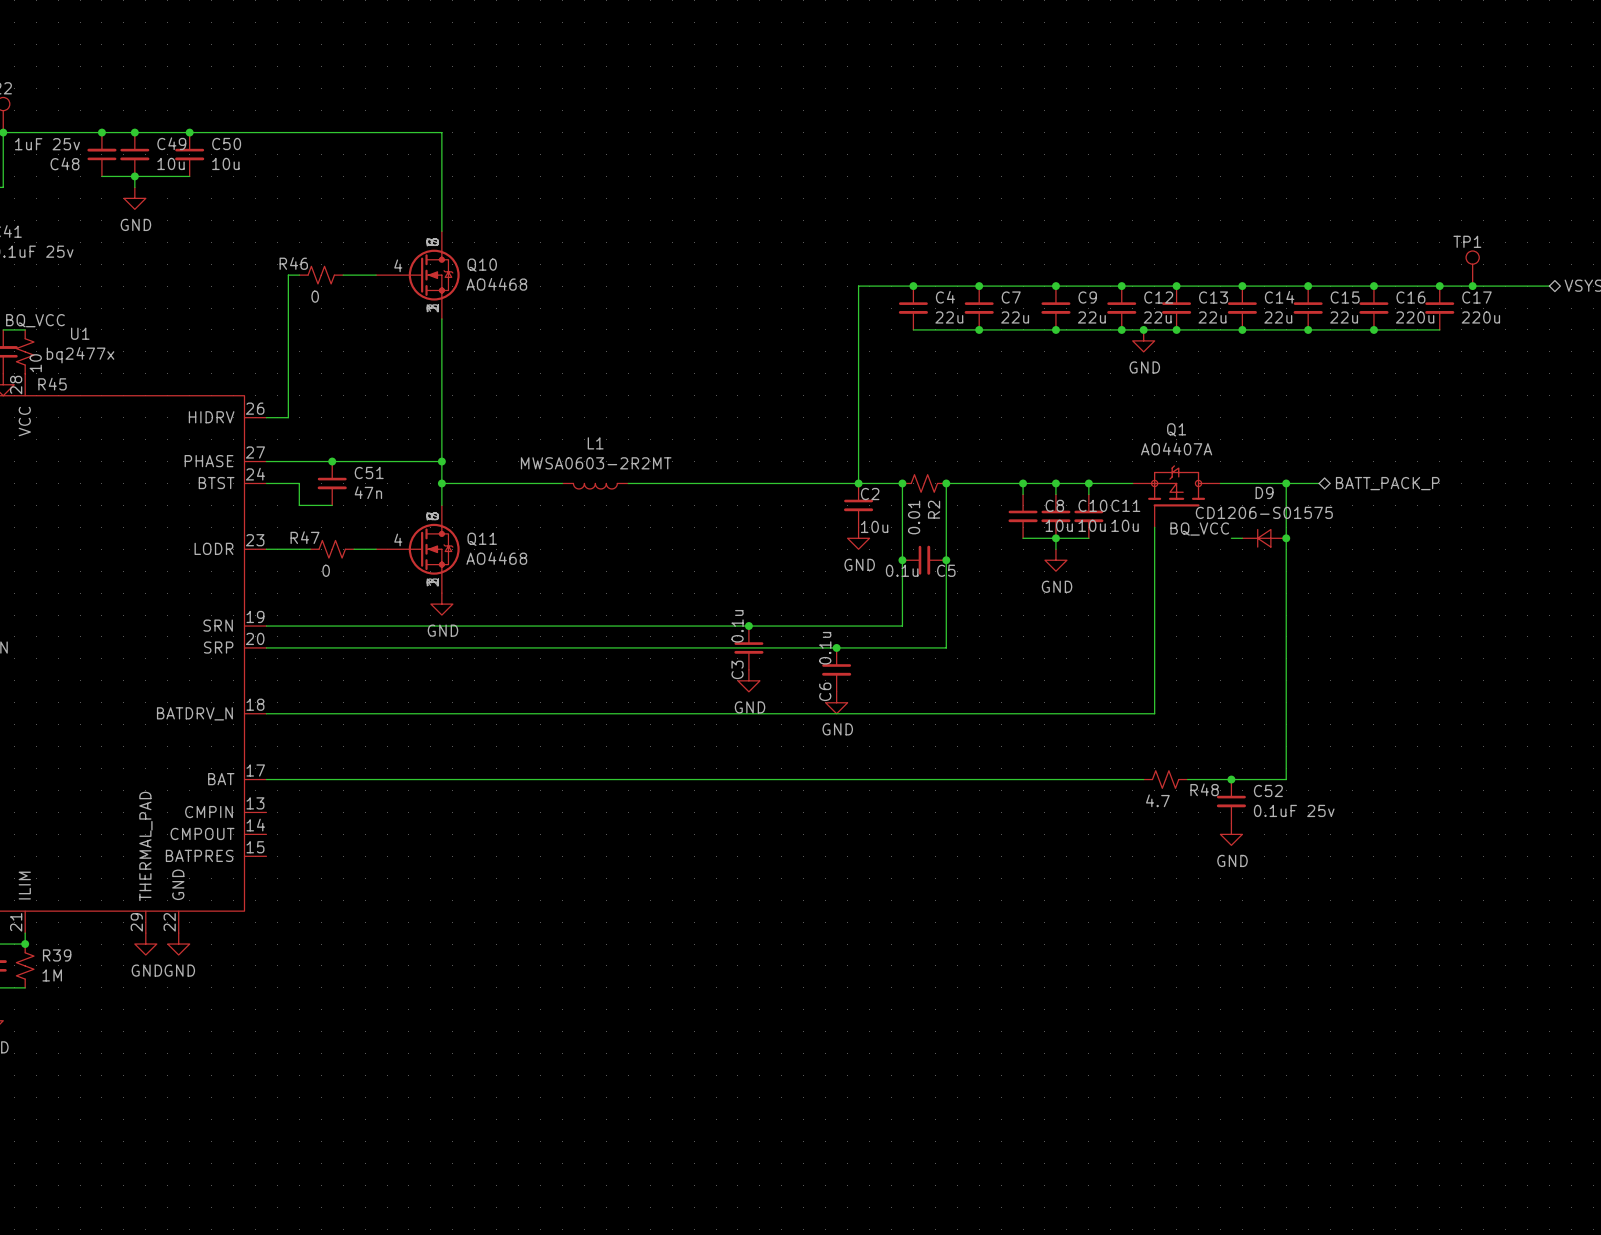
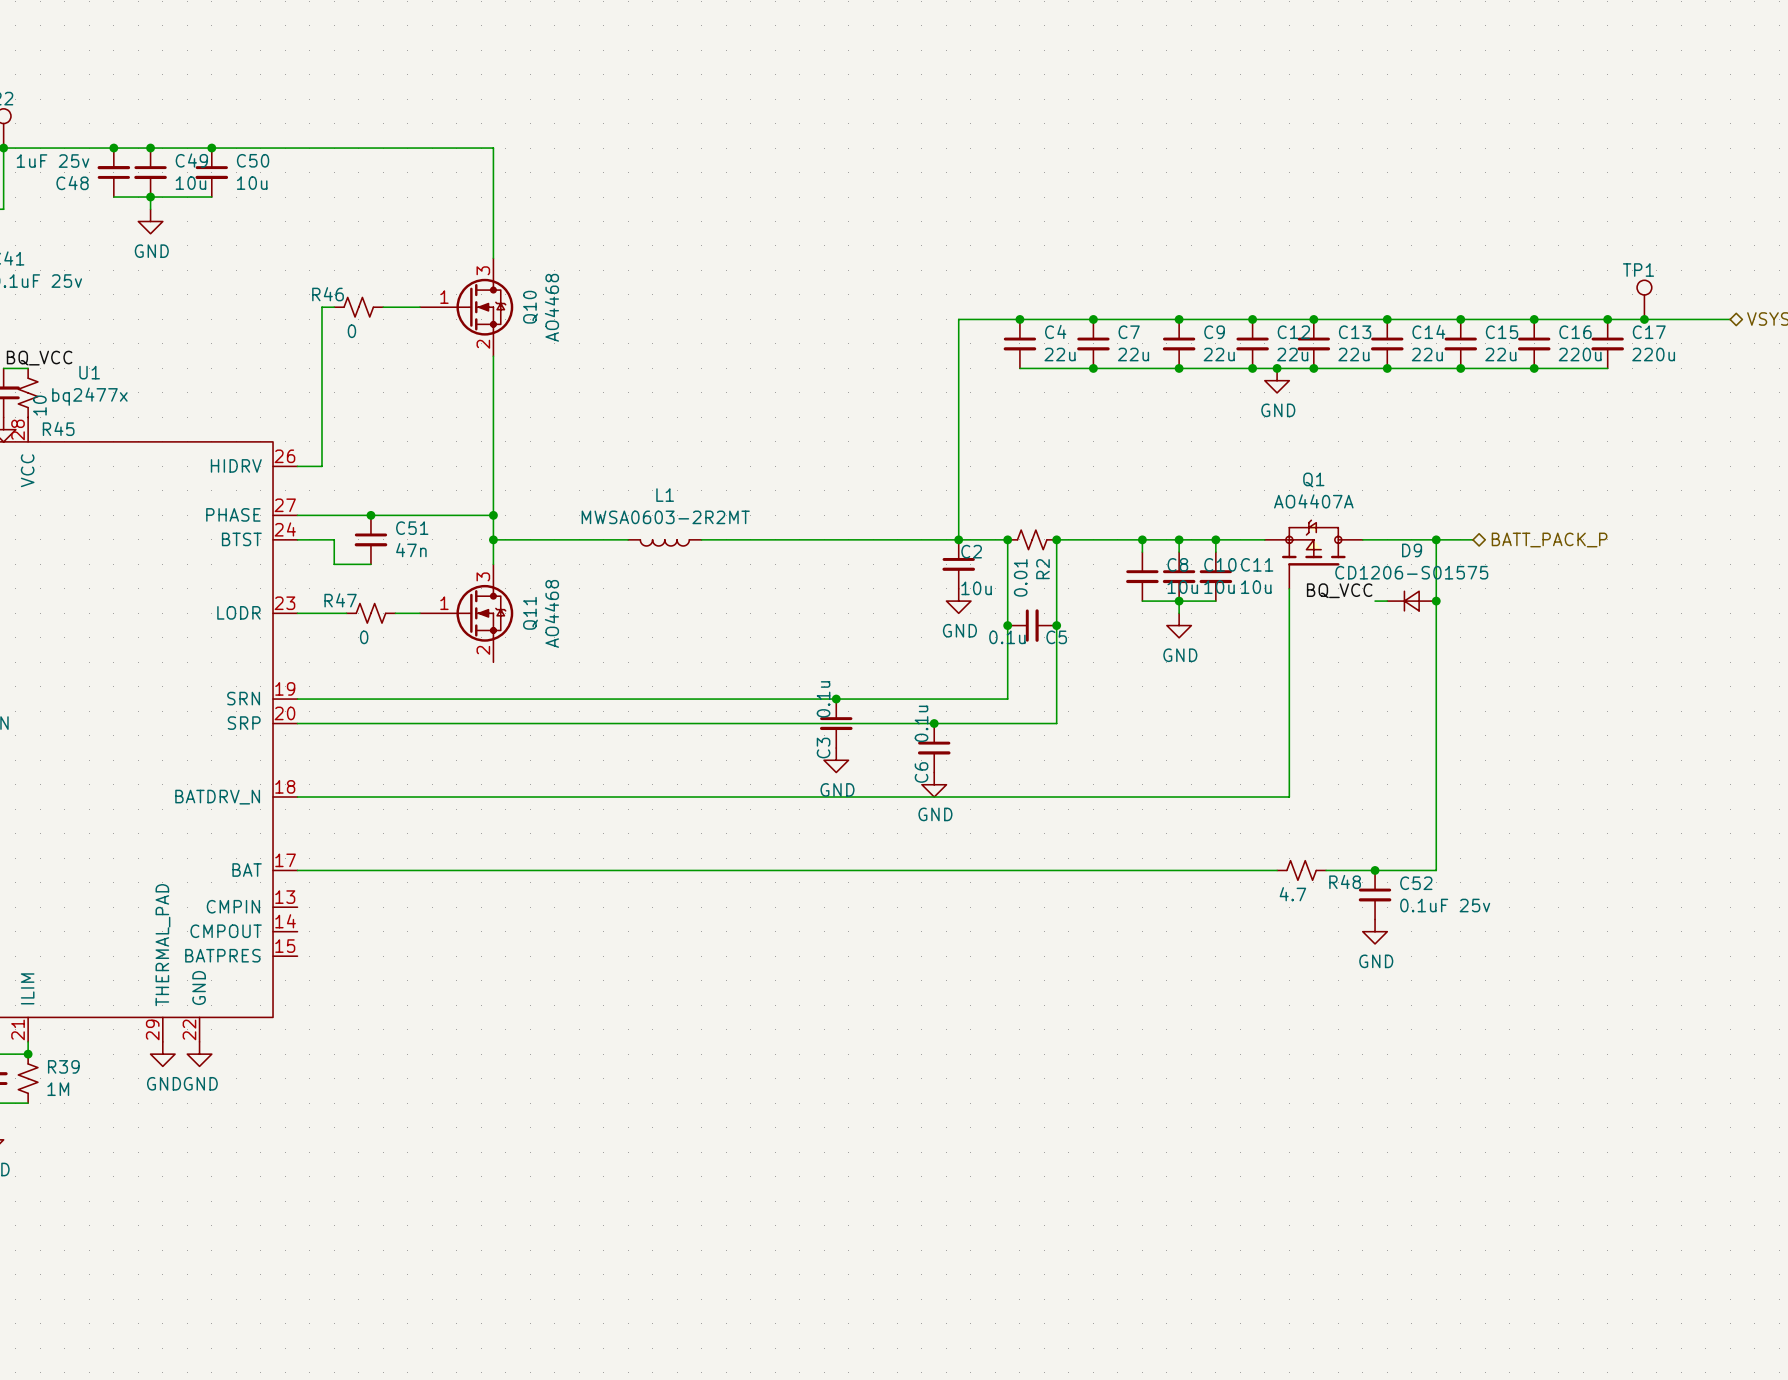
Q10 symbol: [376, 231, 460, 319] -> [419, 258, 514, 357]
Q11 symbol: [376, 505, 460, 594] -> [419, 564, 514, 663]
power symbol: GND (441, 604) -> none

